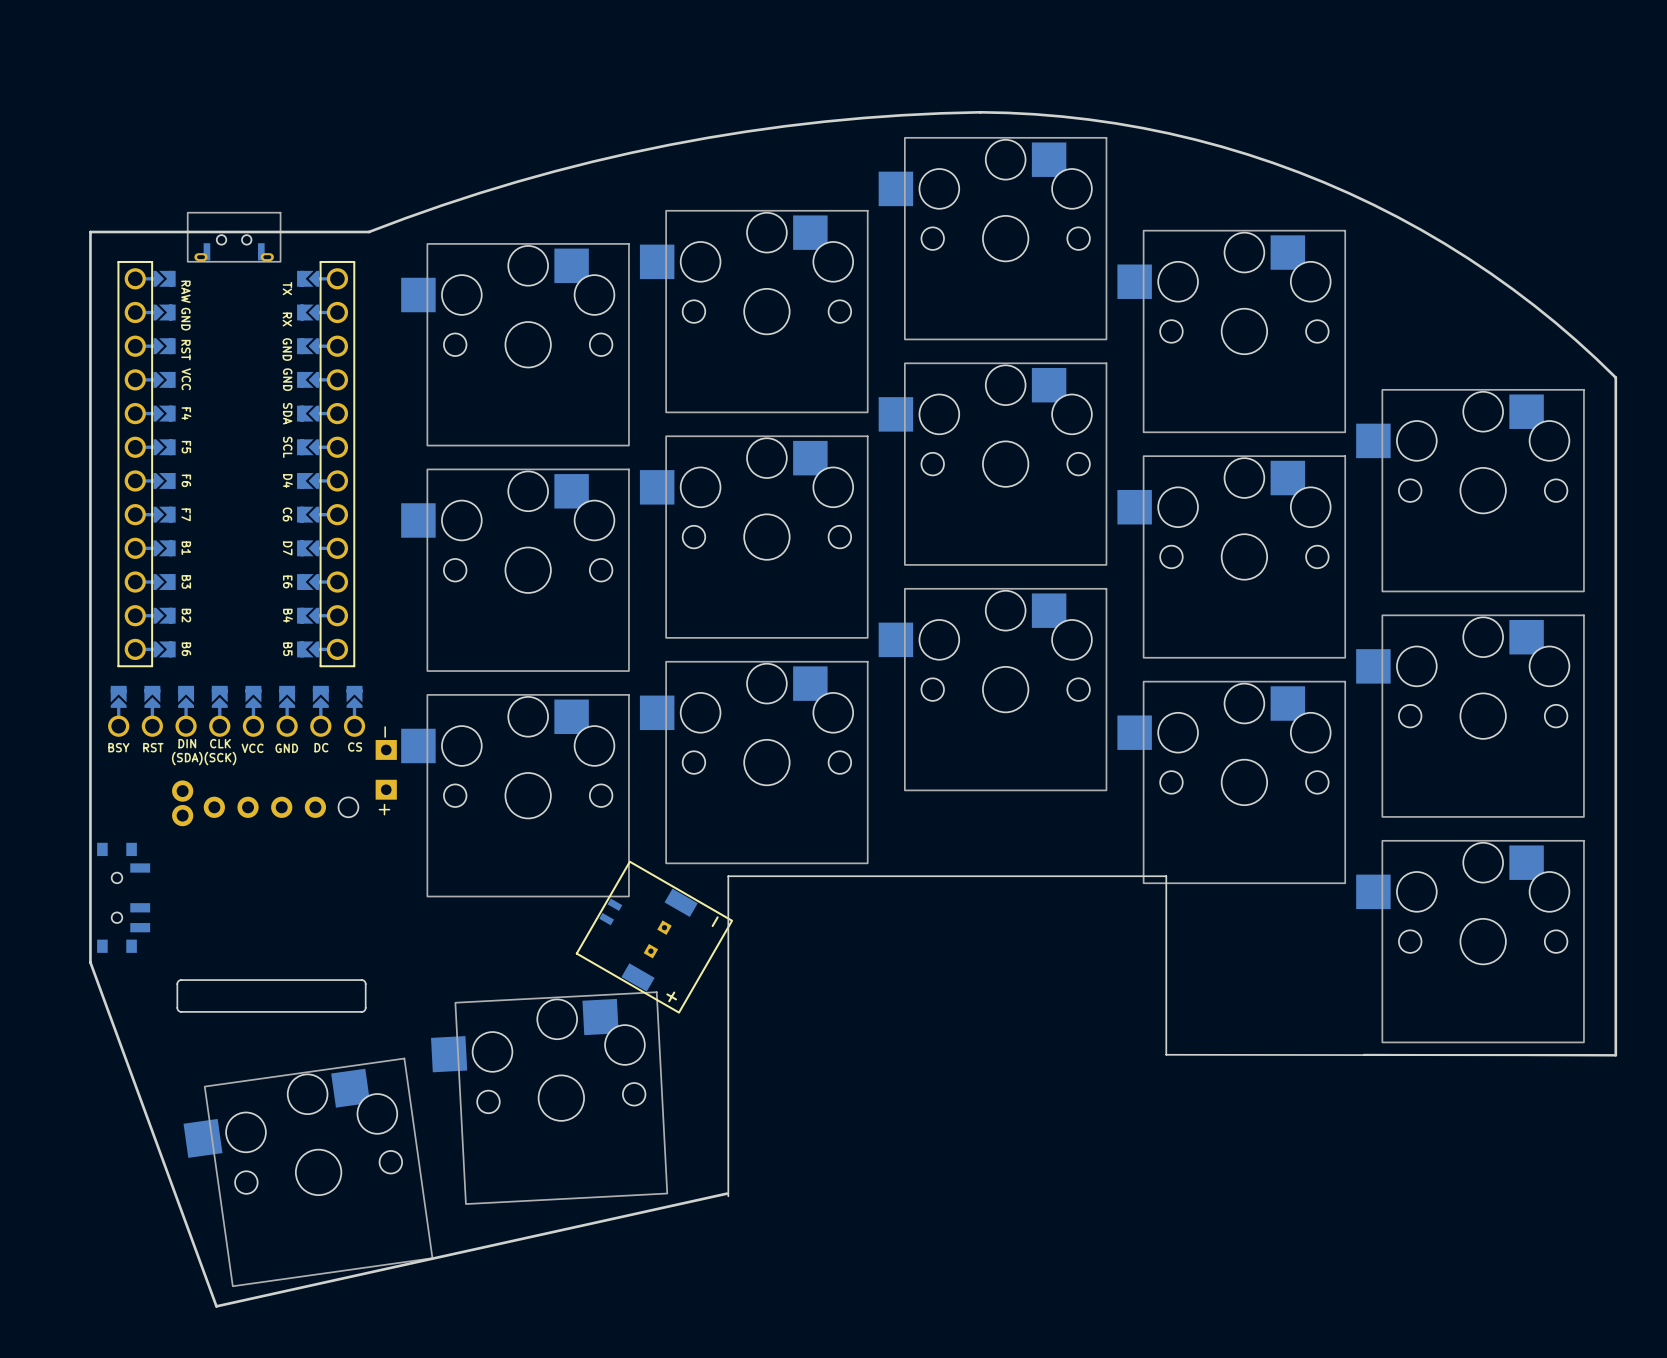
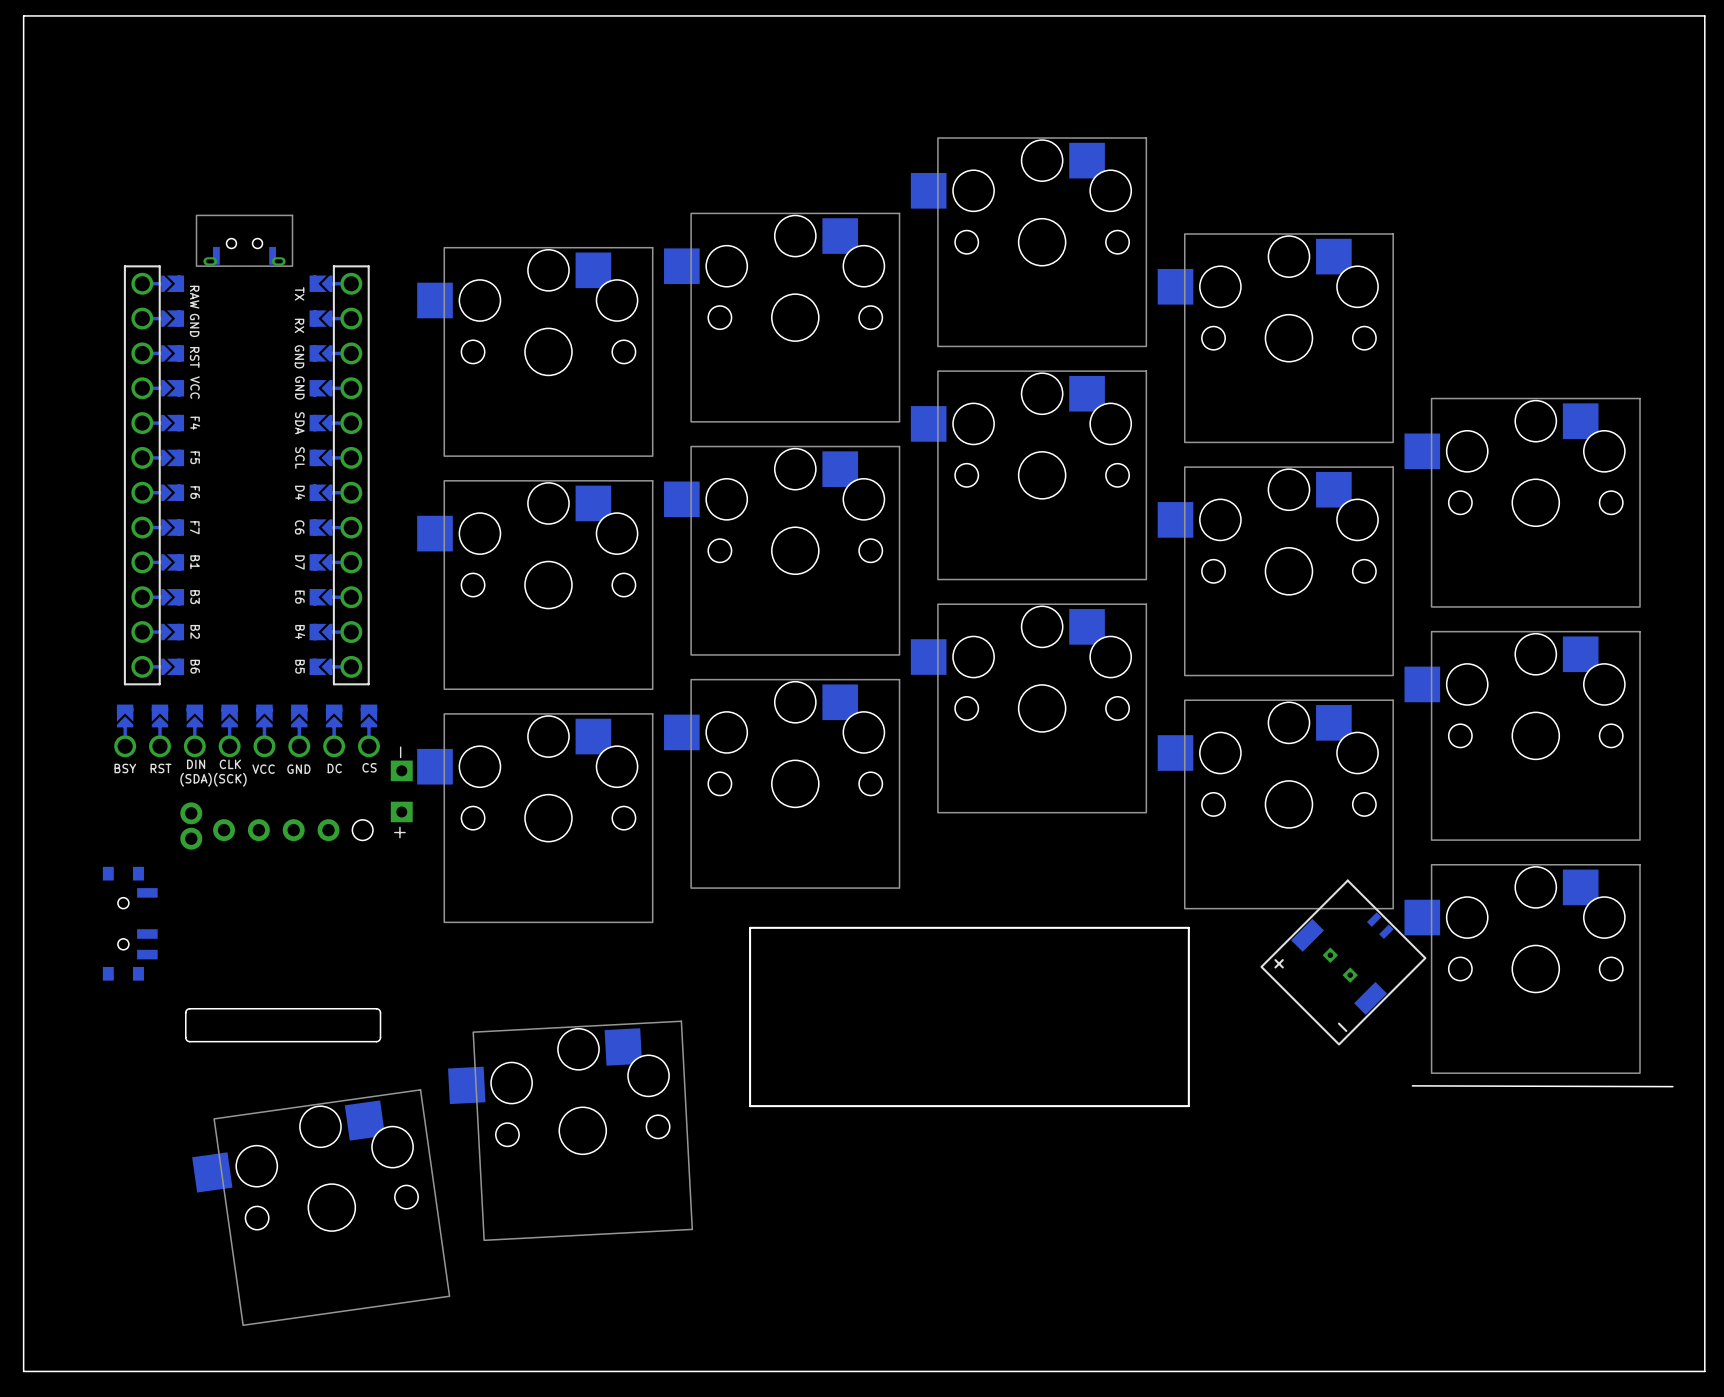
board edge: none -> (1704, 15) (23, 15) (23, 1371) (1704, 1371) (1704, 15)
board edge: (980, 112) (902, 115) (824, 121) (746, 131) (669, 144) (592, 161) (517, 181) (442, 205) (369, 231) (90, 231) (90, 962) (216, 1306) (727, 1193) -> none
board edge: (980, 112) (1061, 116) (1142, 128) (1221, 146) (1273, 163) (1324, 182) (1397, 217) (1445, 243) (1490, 273) (1555, 322) (1615, 377) (1615, 1055) (1166, 1054) (1166, 876) (728, 876) (728, 1196) -> none
board edge: none -> (1188, 927) (750, 927) (750, 1106) (1188, 1106) (1188, 927)
part: none -> (1343, 962)
part: (654, 937) -> none

